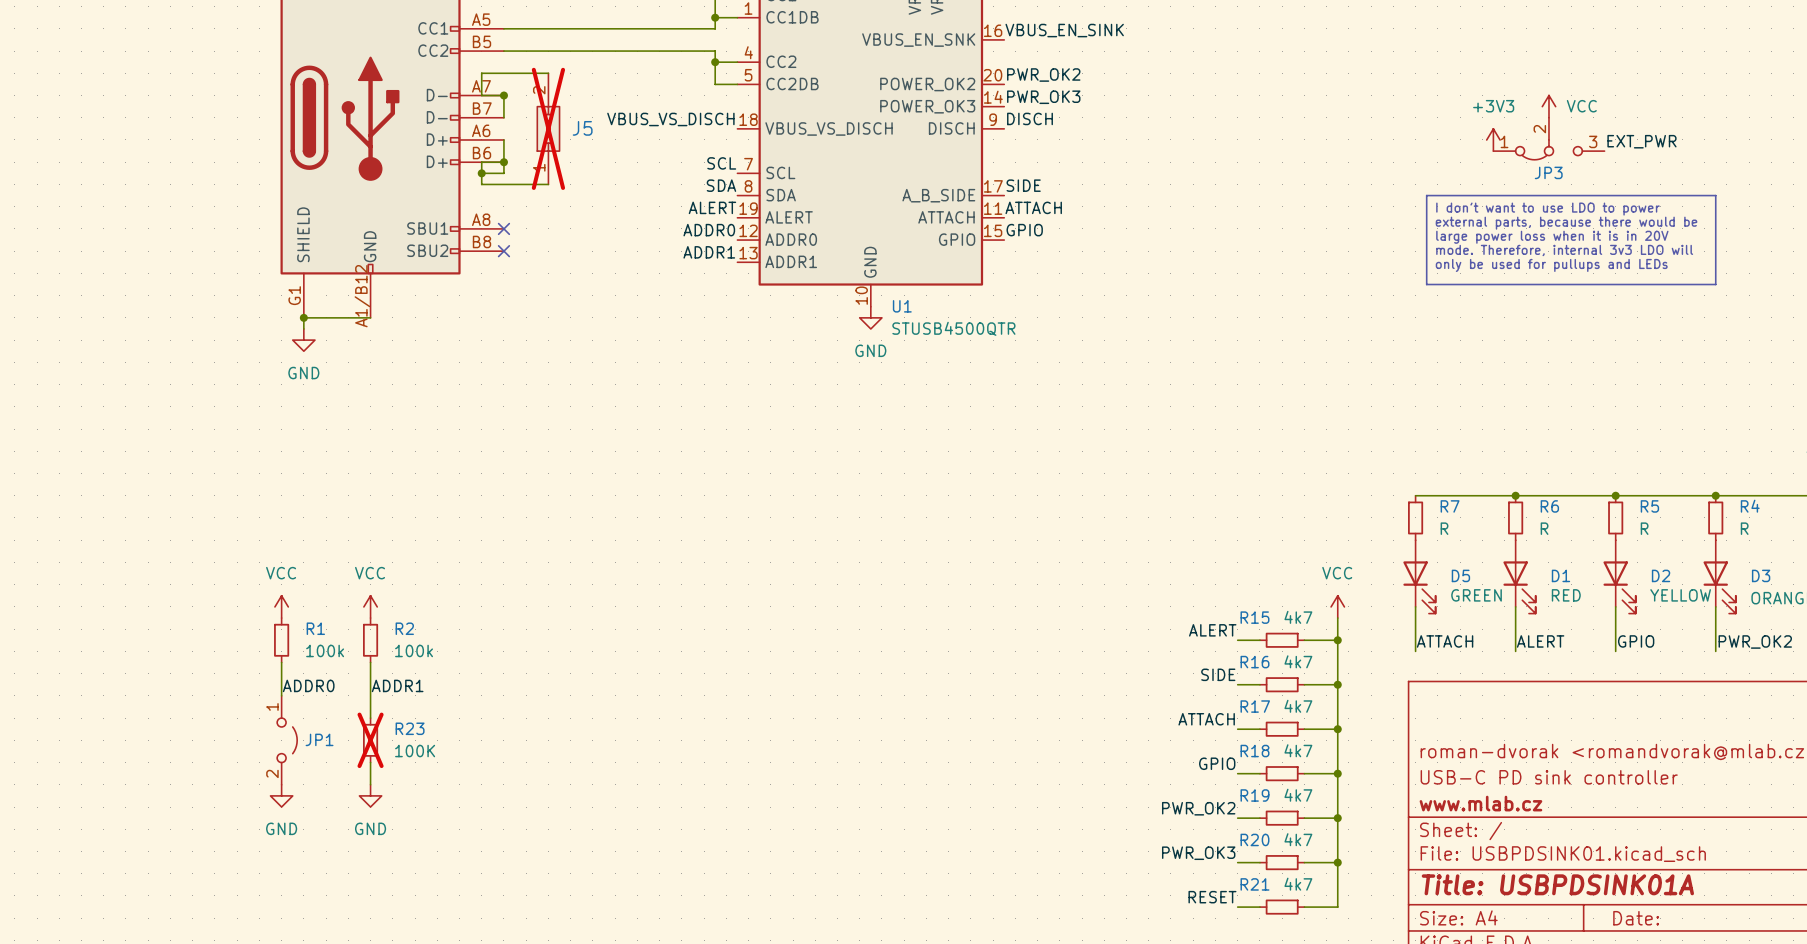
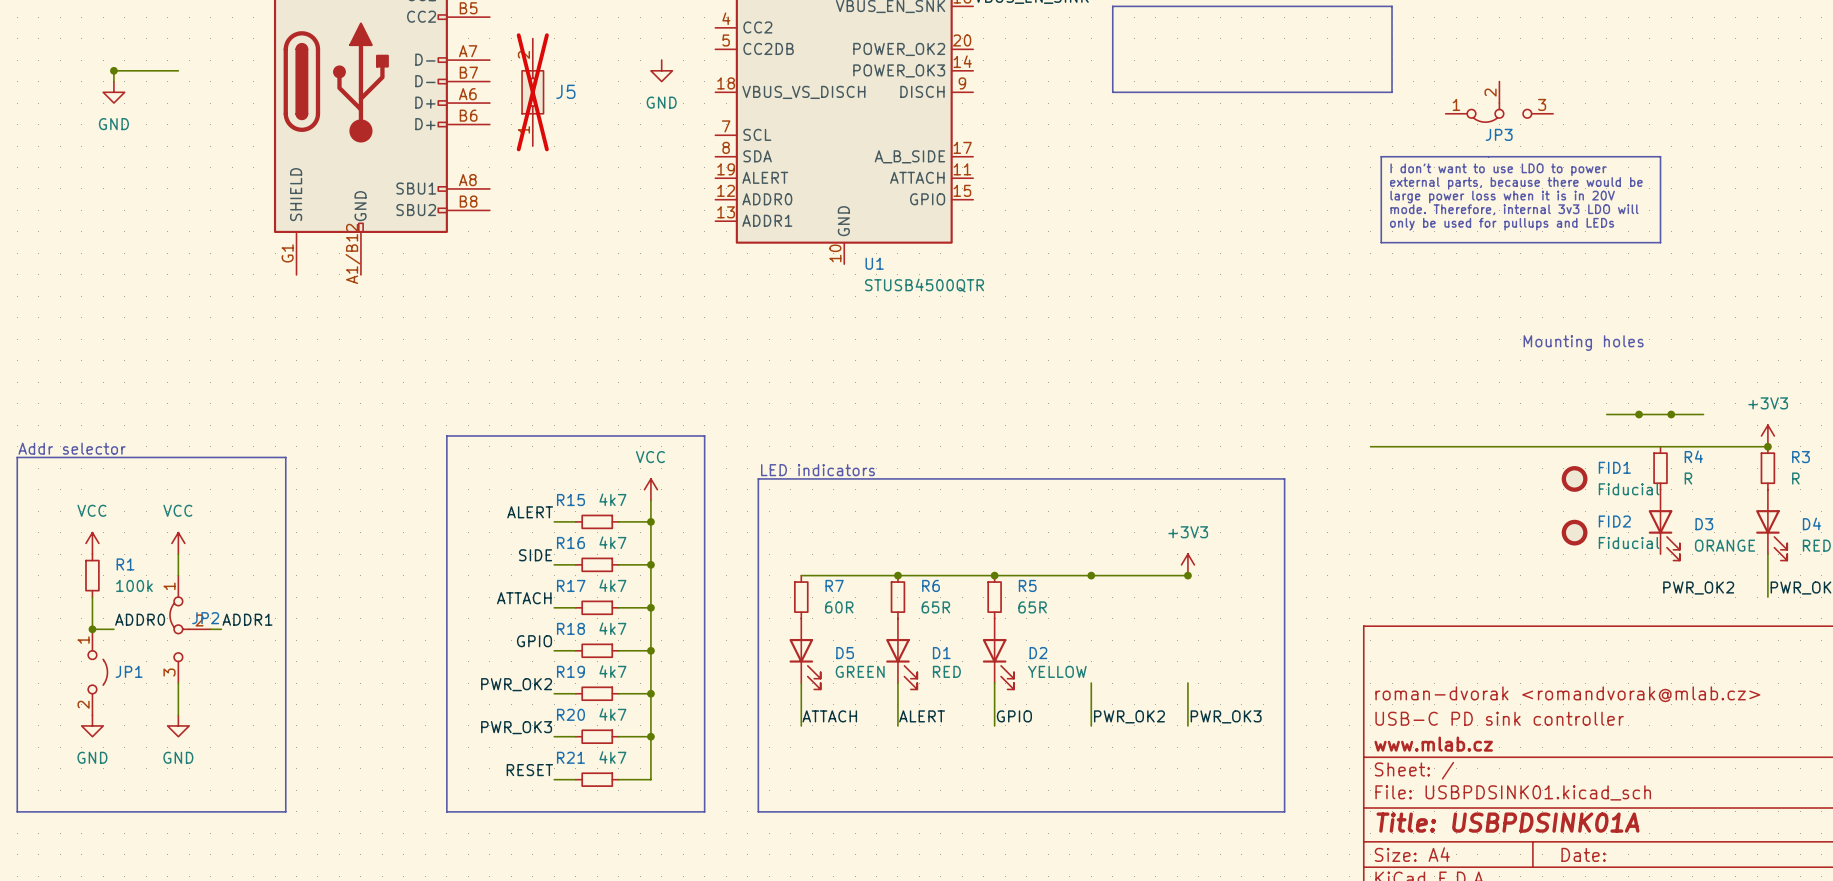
line: none -> (1112, 6) (1392, 6) (1392, 92) (1112, 92) (1112, 6)
wire: (503, 51) (715, 51) (715, 84) (737, 84) -> none
wire: (715, 62) (737, 62) -> none
junction: (715, 62) -> none
wire: (548, 73) (481, 73) (481, 95) (503, 95) (503, 117) -> none
label: PWR_OK2 (1043, 75) -> none
junction: (503, 95) -> none
label: PWR_OK3 (1043, 97) -> none
junction: none -> (113, 70)
wire: none -> (178, 70) (113, 70) (113, 81)
power symbol: none -> GND (661, 70)
power symbol: VCC (1548, 106) -> none
label: DISCH (1029, 118) -> none
label: VBUS_VS_DISCH (670, 119) -> none
power symbol: none -> GND (113, 92)
wire: (503, 139) (503, 173) (481, 173) -> none
power symbol: +3V3 (1493, 139) -> none
label: EXT_PWR (1641, 141) -> none
wire: (503, 162) (481, 162) (481, 184) (548, 184) -> none
junction: (503, 162) -> none
label: SCL (721, 163) -> none
junction: (481, 173) -> none
label: SDA (721, 185) -> none
label: SIDE (1023, 185) -> none
label: ALERT (712, 207) -> none
label: ATTACH (1033, 207) -> none
no-connect mark: (503, 228) -> none
label: ADDR0 (709, 230) -> none
label: GPIO (1024, 230) -> none
no-connect mark: (503, 251) -> none
label: ADDR1 (709, 252) -> none
junction: (303, 317) -> none
wire: (370, 317) (303, 317) (303, 328) -> none
power symbol: GND (870, 317) -> none
power symbol: GND (303, 340) -> none
text: none -> Mounting holes (1583, 343)
wire: none -> (1606, 414) (1703, 414)
junction: none -> (1639, 414)
junction: none -> (1671, 414)
line: none -> (446, 435) (704, 435) (704, 811) (446, 811) (446, 435)
junction: (1515, 495) -> none
junction: (1615, 495) -> none
junction: (1715, 495) -> none
text: none -> Addr selector (72, 448)
line: none -> (17, 457) (285, 457) (285, 811) (17, 811) (17, 457)
R7 position: (1415, 517) -> (801, 597)
R6 position: (1515, 517) -> (897, 597)
R5 position: (1615, 517) -> (994, 597)
text: none -> LED indicators (818, 470)
R7 value: R (1444, 528) -> 60R (839, 607)
R6 value: R (1544, 528) -> 65R (935, 607)
R5 value: R (1644, 528) -> 65R (1032, 607)
line: none -> (758, 478) (1284, 478) (1284, 811) (758, 811) (758, 478)
FID1: none -> Fiducial (1574, 478)
power symbol: none -> VCC (650, 489)
wire: none -> (650, 500) (650, 779) (618, 779)
label: none -> ALERT (530, 512)
wire: none -> (554, 521) (575, 521)
wire: none -> (618, 521) (650, 521)
junction: none -> (650, 521)
D5 position: (1419, 576) -> (805, 654)
D1 position: (1519, 576) -> (901, 654)
D2 position: (1619, 576) -> (998, 654)
FID2: none -> Fiducial (1574, 532)
power symbol: none -> VCC (92, 543)
power symbol: none -> VCC (178, 543)
wire: none -> (178, 554) (178, 575)
power symbol: VCC (281, 606) -> none
power symbol: VCC (370, 606) -> none
power symbol: VCC (1337, 606) -> none
wire: (1415, 606) (1415, 651) -> none
wire: (1515, 606) (1515, 651) -> none
wire: (1615, 606) (1615, 651) -> none
wire: (1715, 606) (1715, 651) -> none
label: none -> SIDE (535, 555)
wire: none -> (554, 564) (575, 564)
wire: none -> (618, 564) (650, 564)
junction: none -> (650, 564)
power symbol: none -> +3V3 (1187, 564)
wire: (1337, 618) (1337, 907) (1304, 907) -> none
wire: none -> (801, 575) (1187, 575)
junction: none -> (897, 575)
junction: none -> (994, 575)
junction: none -> (1091, 575)
junction: none -> (1187, 575)
label: ALERT (1212, 630) -> none
R1 position: (281, 640) -> (92, 575)
R2: 100k (370, 640) -> none
wire: (1237, 640) (1259, 640) -> none
R15 position: (1282, 640) -> (597, 521)
wire: (1304, 640) (1337, 640) -> none
junction: (1337, 640) -> none
label: ATTACH (1445, 641) -> none
label: ALERT (1540, 641) -> none
label: GPIO (1636, 641) -> none
wire: none -> (92, 597) (92, 629) (113, 629)
label: none -> ATTACH (524, 598)
wire: (281, 662) (281, 695) -> (178, 683) (178, 715)
wire: (370, 662) (370, 718) -> none
wire: none -> (554, 607) (575, 607)
wire: none -> (618, 607) (650, 607)
junction: none -> (650, 607)
label: SIDE (1218, 674) -> none
junction: none -> (92, 629)
JP2: none -> (190, 629)
wire: none -> (210, 629) (221, 629)
wire: (1237, 684) (1259, 684) -> none
R16 position: (1282, 684) -> (597, 564)
wire: (1304, 684) (1337, 684) -> none
junction: (1337, 684) -> none
label position: ADDR0 (308, 685) -> ADDR0 (140, 619)
label position: ADDR1 (397, 685) -> ADDR1 (247, 619)
label: none -> GPIO (534, 641)
wire: none -> (554, 650) (575, 650)
wire: none -> (618, 650) (650, 650)
junction: none -> (650, 650)
label: ATTACH (1206, 719) -> none
wire: (1237, 729) (1259, 729) -> none
R17 position: (1282, 729) -> (597, 607)
wire: (1304, 729) (1337, 729) -> none
junction: (1337, 729) -> none
JP1 position: (287, 740) -> (97, 672)
R23: 100K (370, 740) -> none
wire: none -> (801, 683) (801, 725)
wire: none -> (897, 683) (897, 725)
wire: none -> (994, 683) (994, 725)
wire: none -> (1091, 683) (1091, 725)
wire: none -> (1187, 683) (1187, 725)
label: none -> PWR_OK2 (516, 684)
wire: none -> (554, 693) (575, 693)
wire: none -> (618, 693) (650, 693)
junction: none -> (650, 693)
wire: (370, 762) (370, 784) -> none
label position: GPIO (1217, 763) -> GPIO (1014, 716)
wire: (1237, 773) (1259, 773) -> none
R18 position: (1282, 773) -> (597, 650)
wire: (1304, 773) (1337, 773) -> none
junction: (1337, 773) -> none
label: none -> ATTACH (829, 716)
label: none -> ALERT (922, 716)
power symbol: none -> GND (92, 725)
power symbol: none -> GND (178, 725)
label: none -> PWR_OK3 (516, 727)
power symbol: GND (281, 795) -> none
power symbol: GND (370, 795) -> none
wire: none -> (554, 736) (575, 736)
wire: none -> (618, 736) (650, 736)
junction: none -> (650, 736)
label position: PWR_OK2 (1198, 808) -> PWR_OK2 (1129, 716)
wire: (1237, 818) (1259, 818) -> none
R19 position: (1282, 818) -> (597, 693)
wire: (1304, 818) (1337, 818) -> none
junction: (1337, 818) -> none
label: none -> RESET (529, 770)
wire: none -> (554, 779) (575, 779)
label position: PWR_OK3 (1198, 853) -> PWR_OK3 (1226, 716)
wire: (1237, 862) (1259, 862) -> none
R20 position: (1282, 862) -> (597, 736)
wire: (1304, 862) (1337, 862) -> none
junction: (1337, 862) -> none
label: RESET (1212, 897) -> none
wire: (1237, 907) (1259, 907) -> none
R21 position: (1282, 907) -> (597, 779)

